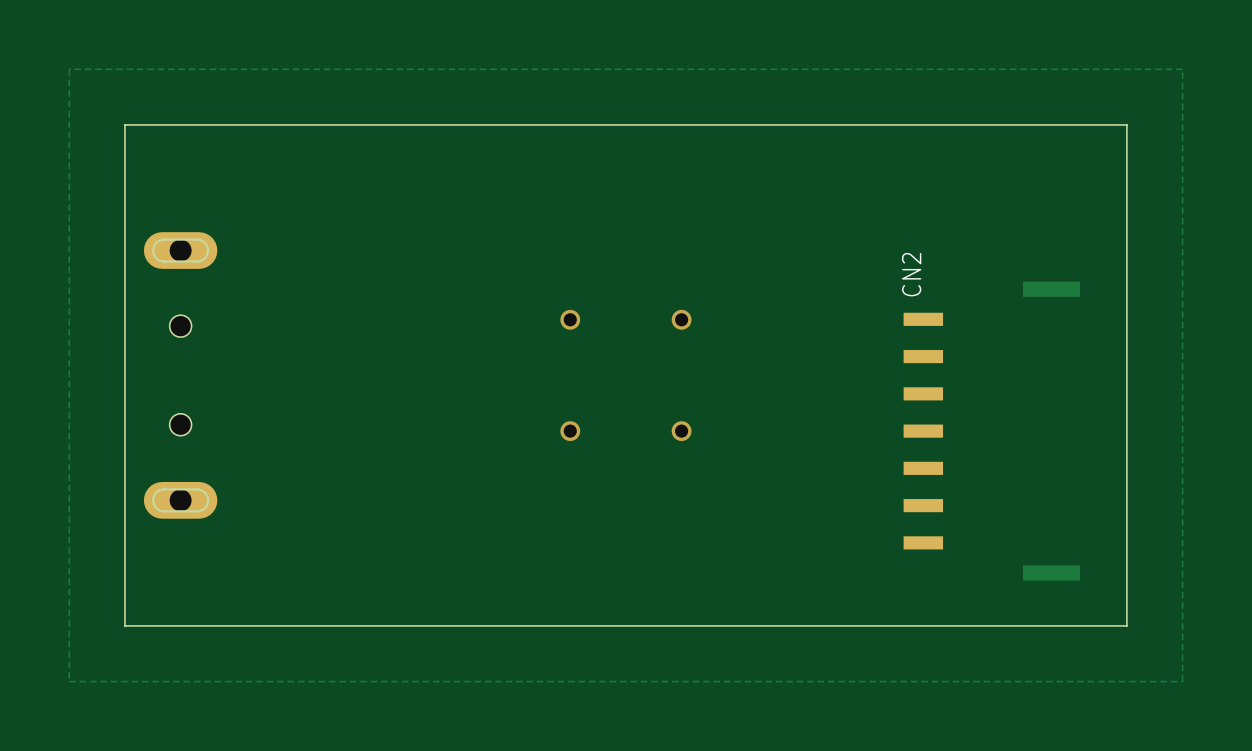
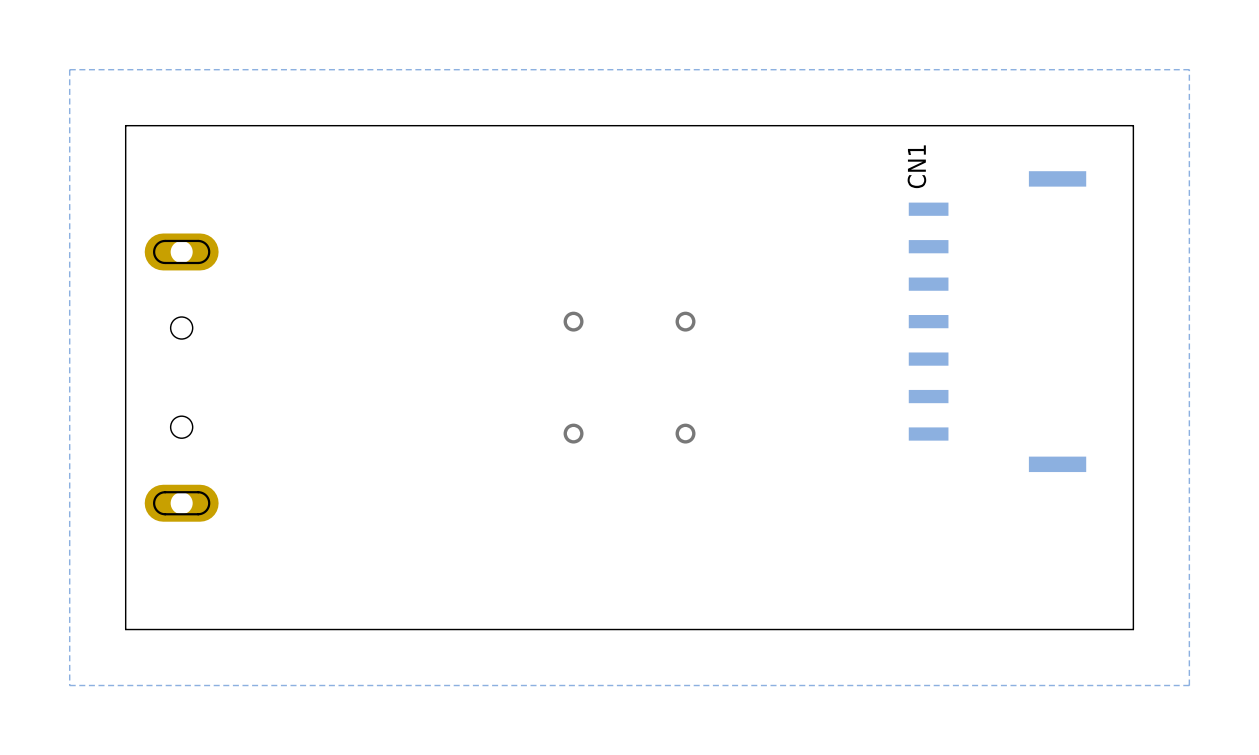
CN1: none -> (997, 321)
CN2: (991, 431) -> none

